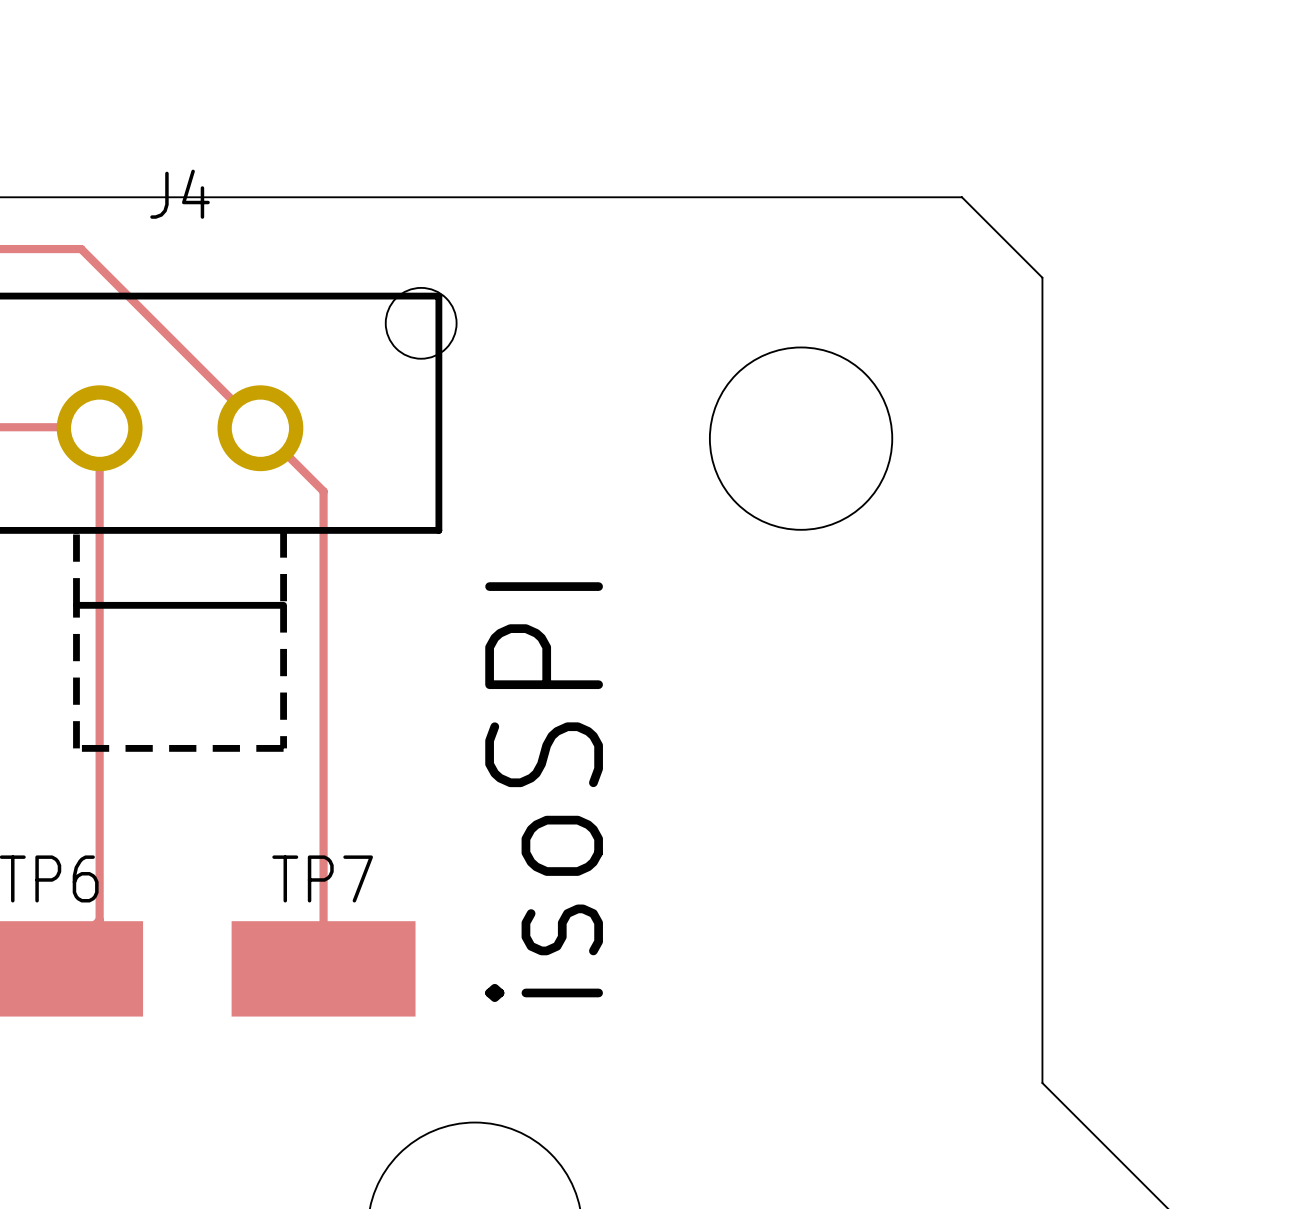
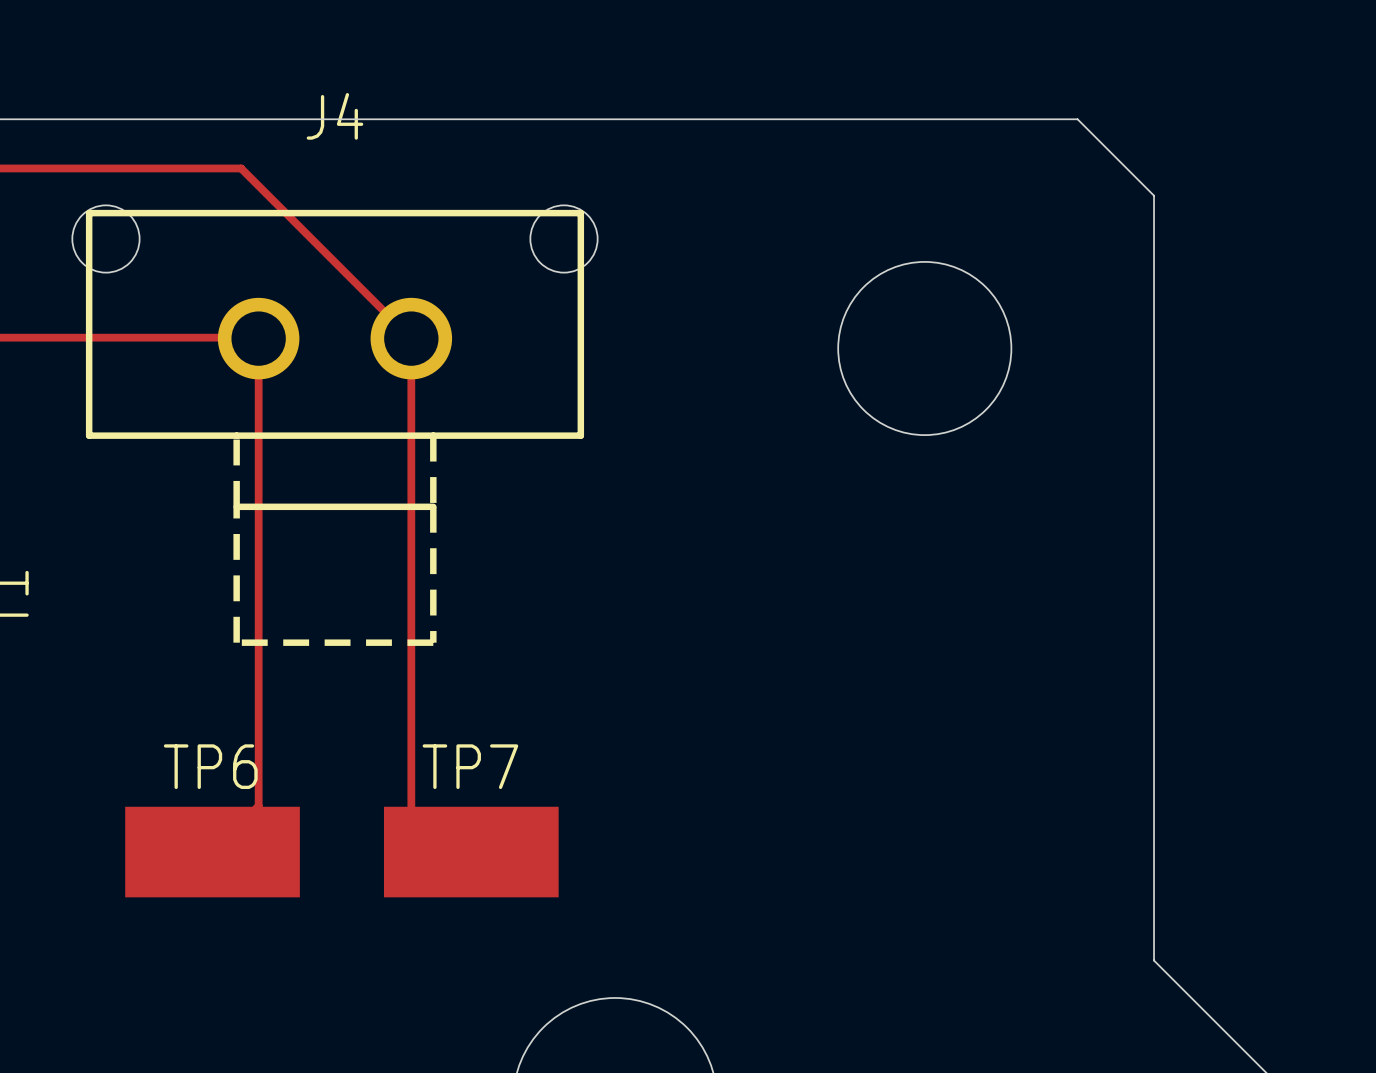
top track: (260, 428) (323, 491) (323, 968) -> (411, 338) (411, 865) (421, 876)
drawing: [485, 582, 603, 1003] -> none

